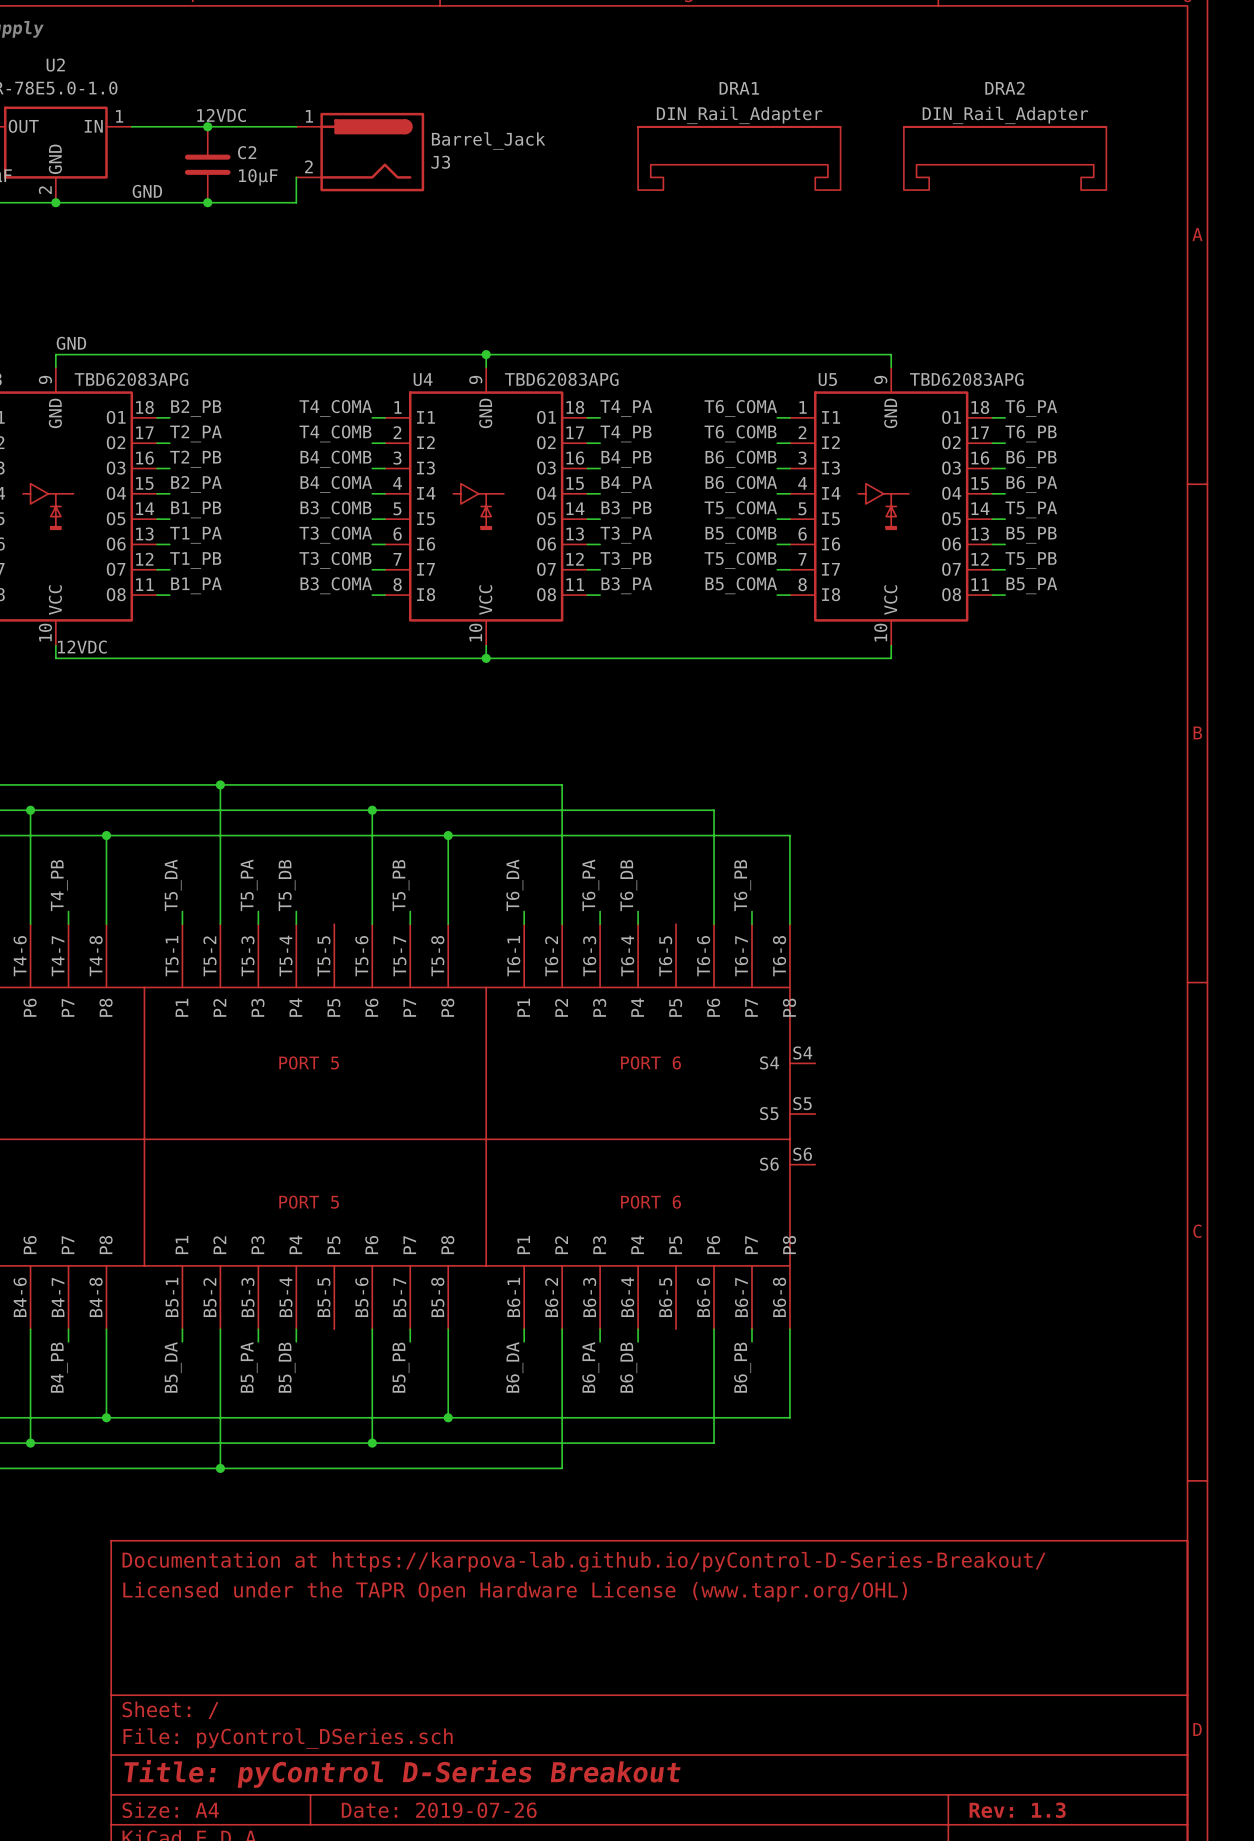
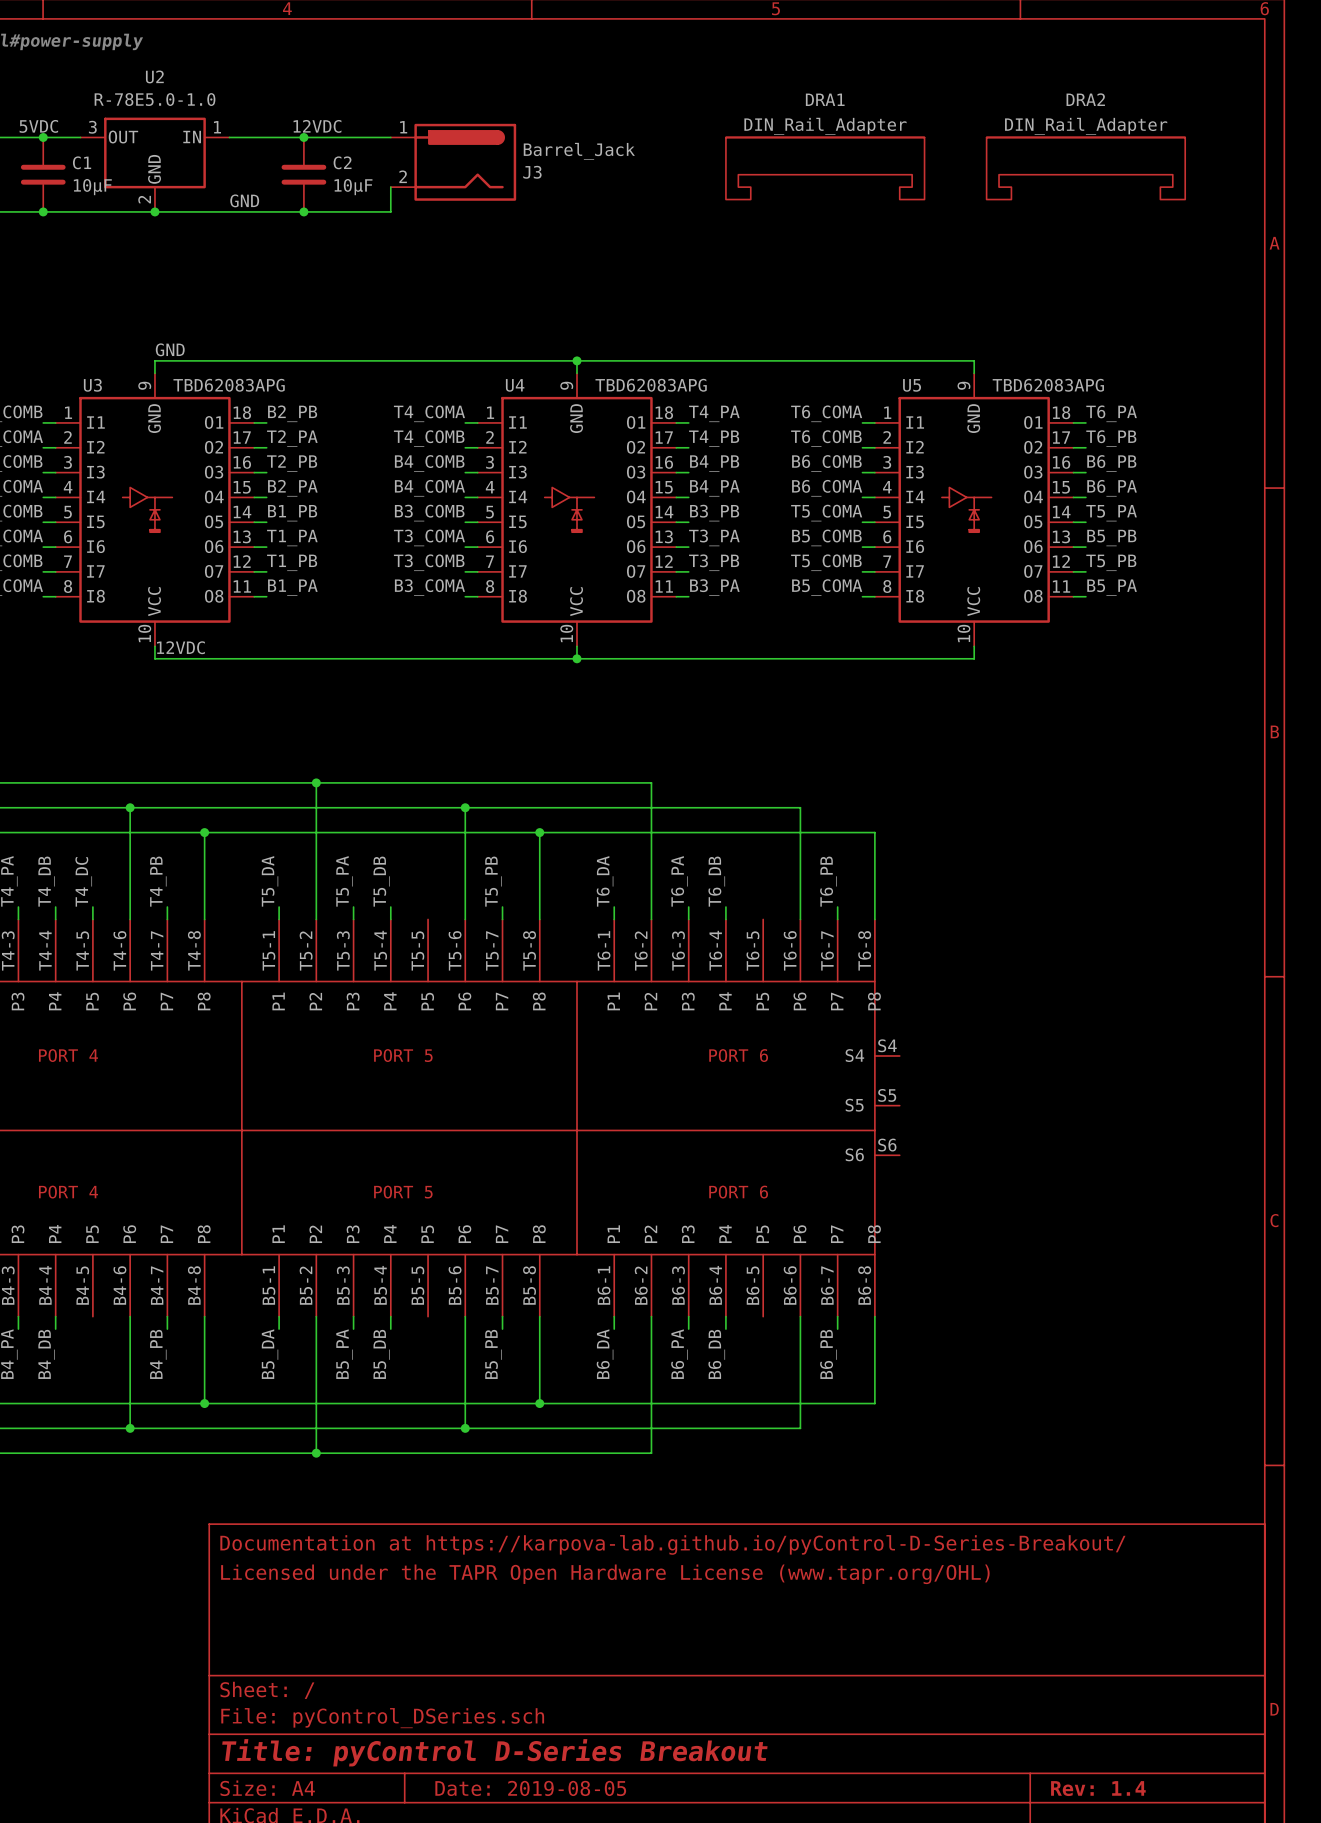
title block: Date: 2019-07-26 (439, 1810) -> Date: 2019-08-05 (530, 1788)
title block: Rev: 1.3 (1017, 1810) -> Rev: 1.4 (1098, 1788)

